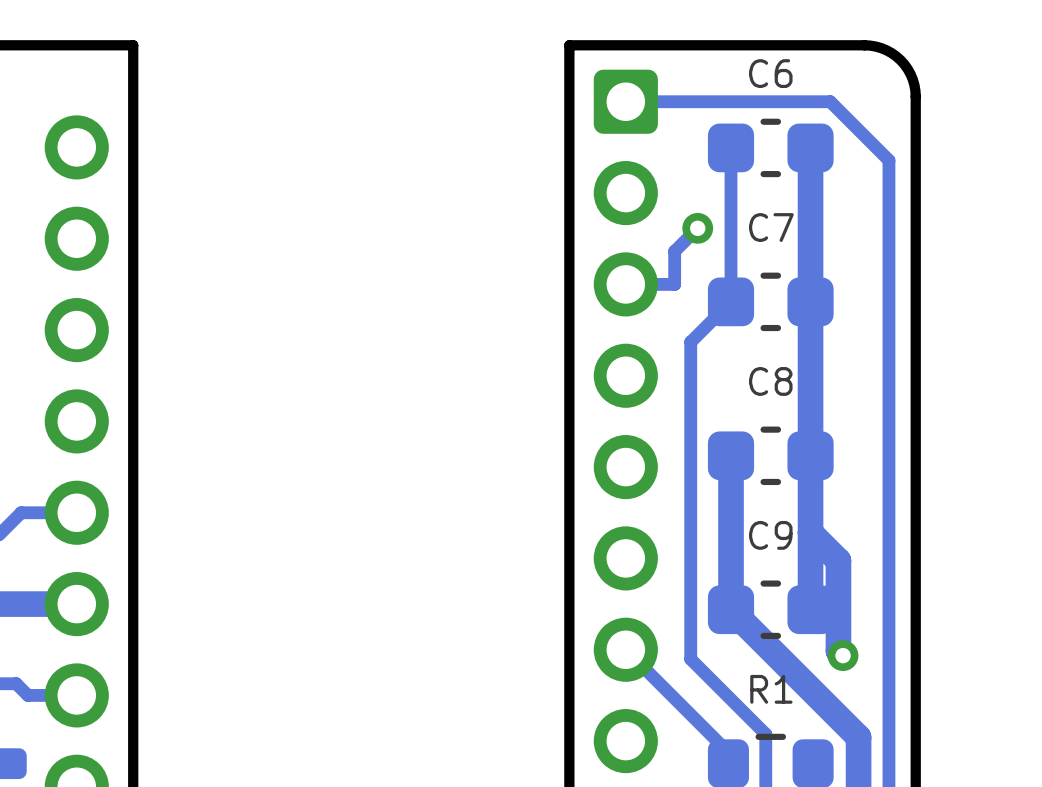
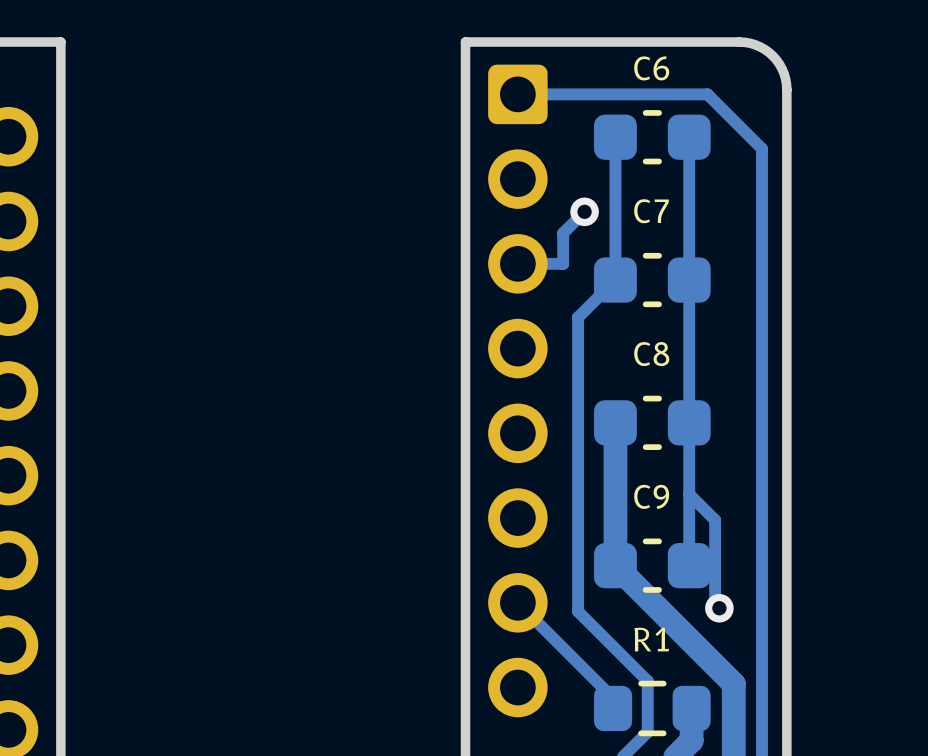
track width: thick (810, 147) (810, 609) -> thin (689, 137) (689, 565)
track width: thick (810, 532) (838, 560) (838, 651) (843, 655) -> thin (689, 494) (715, 520) (715, 604) (719, 608)

